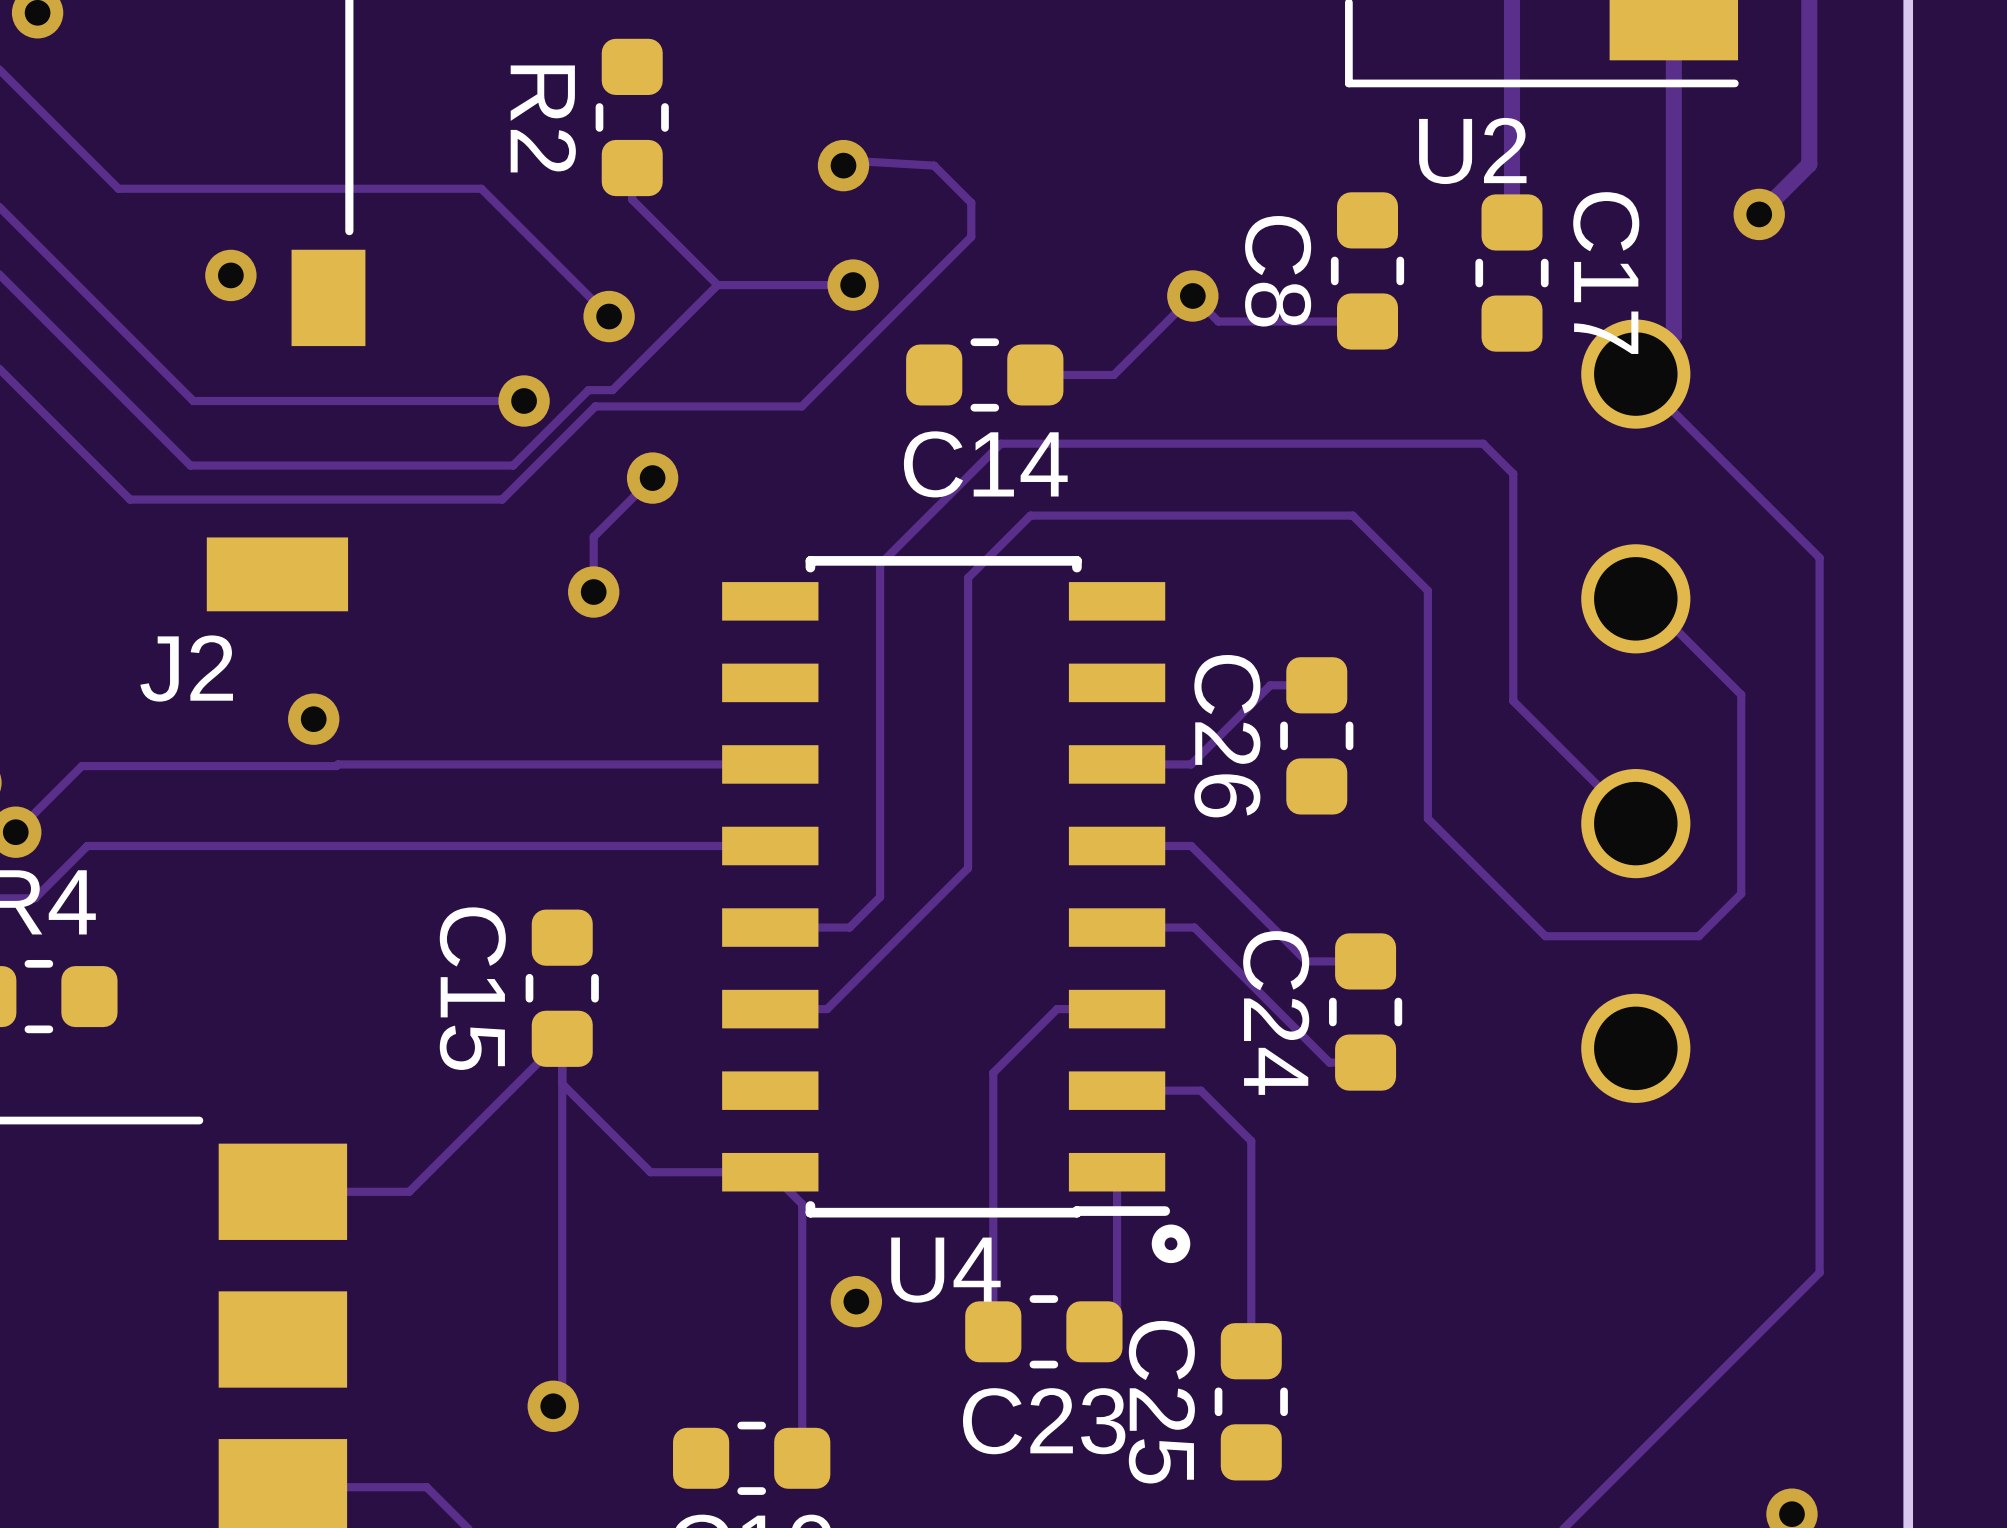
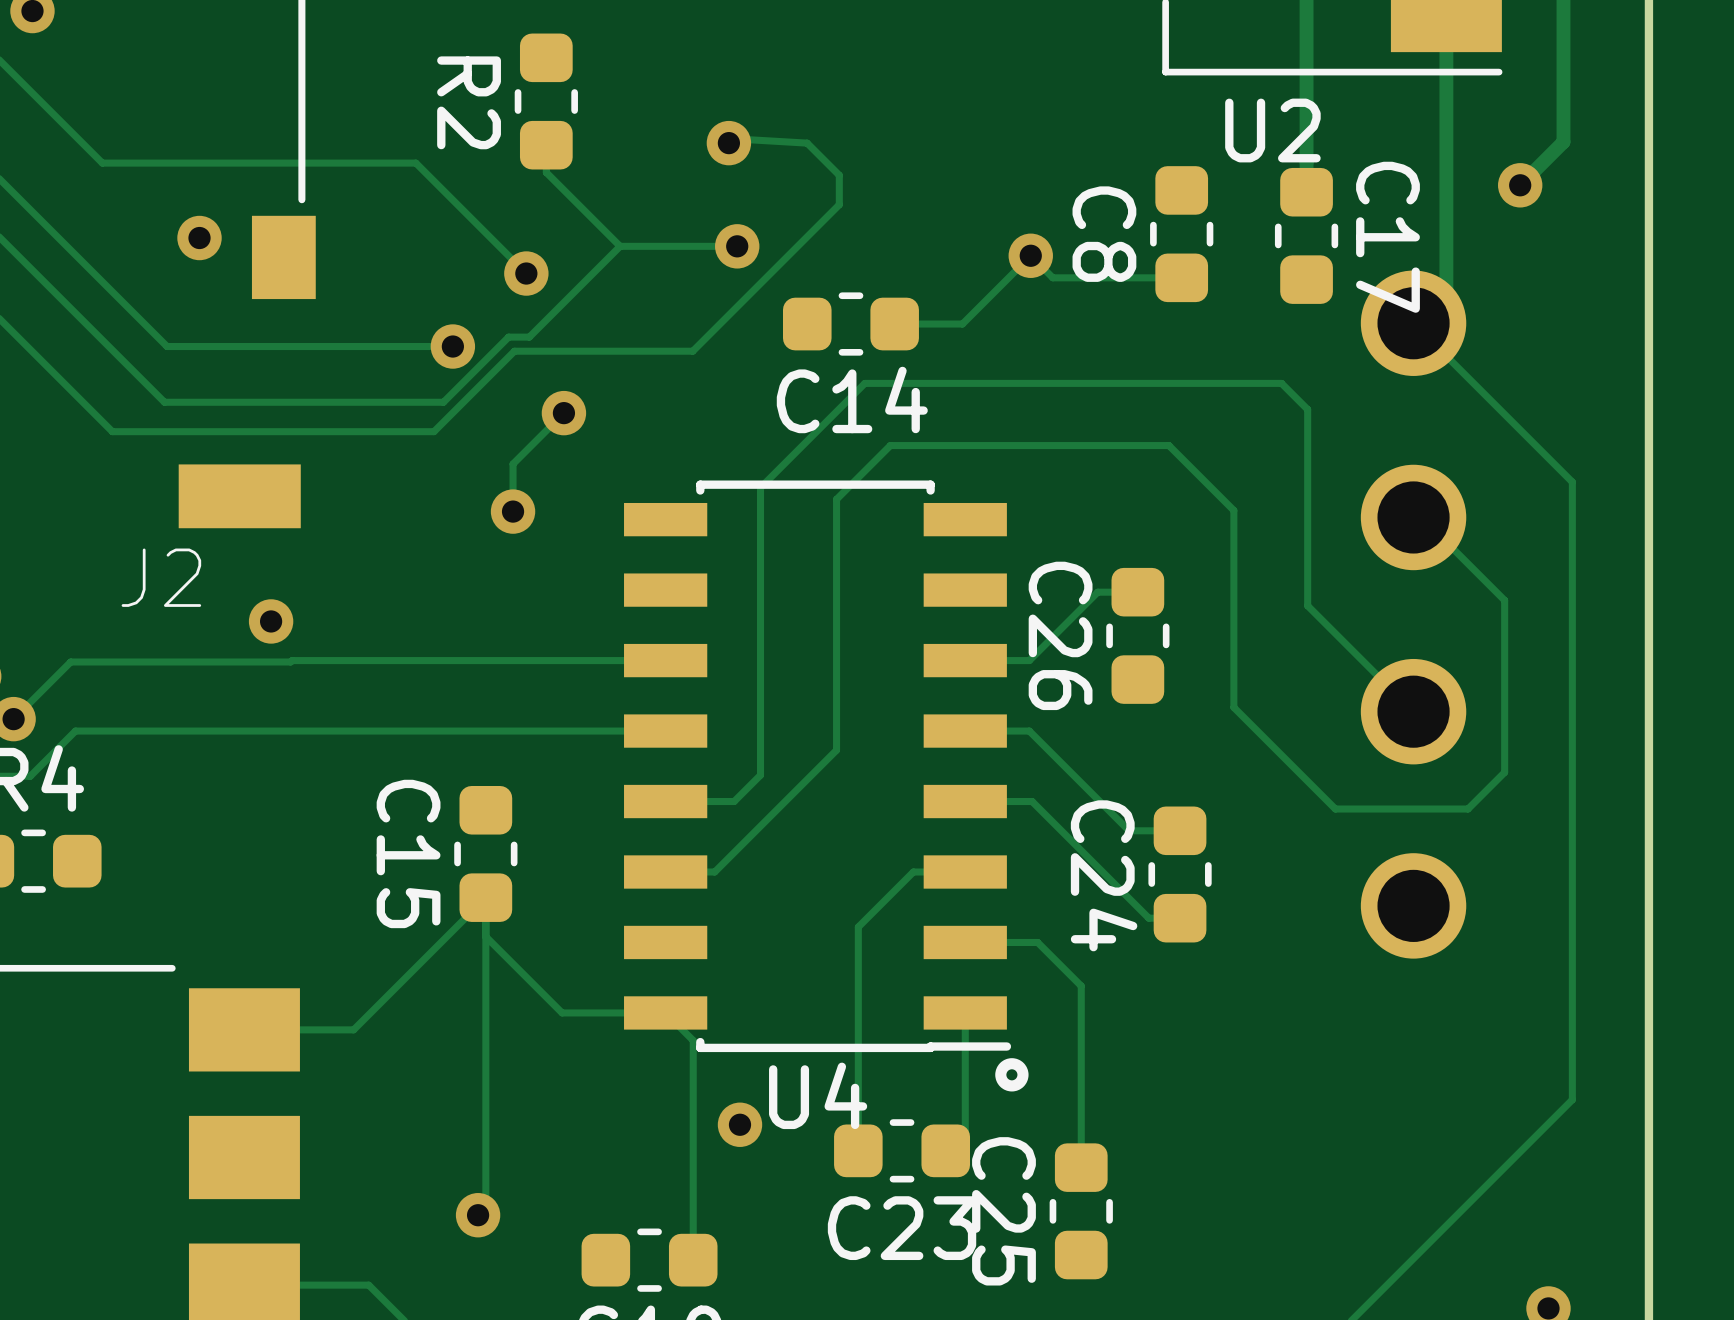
part footprint: [1581, 319, 1691, 1103] -> [1360, 270, 1467, 959]

